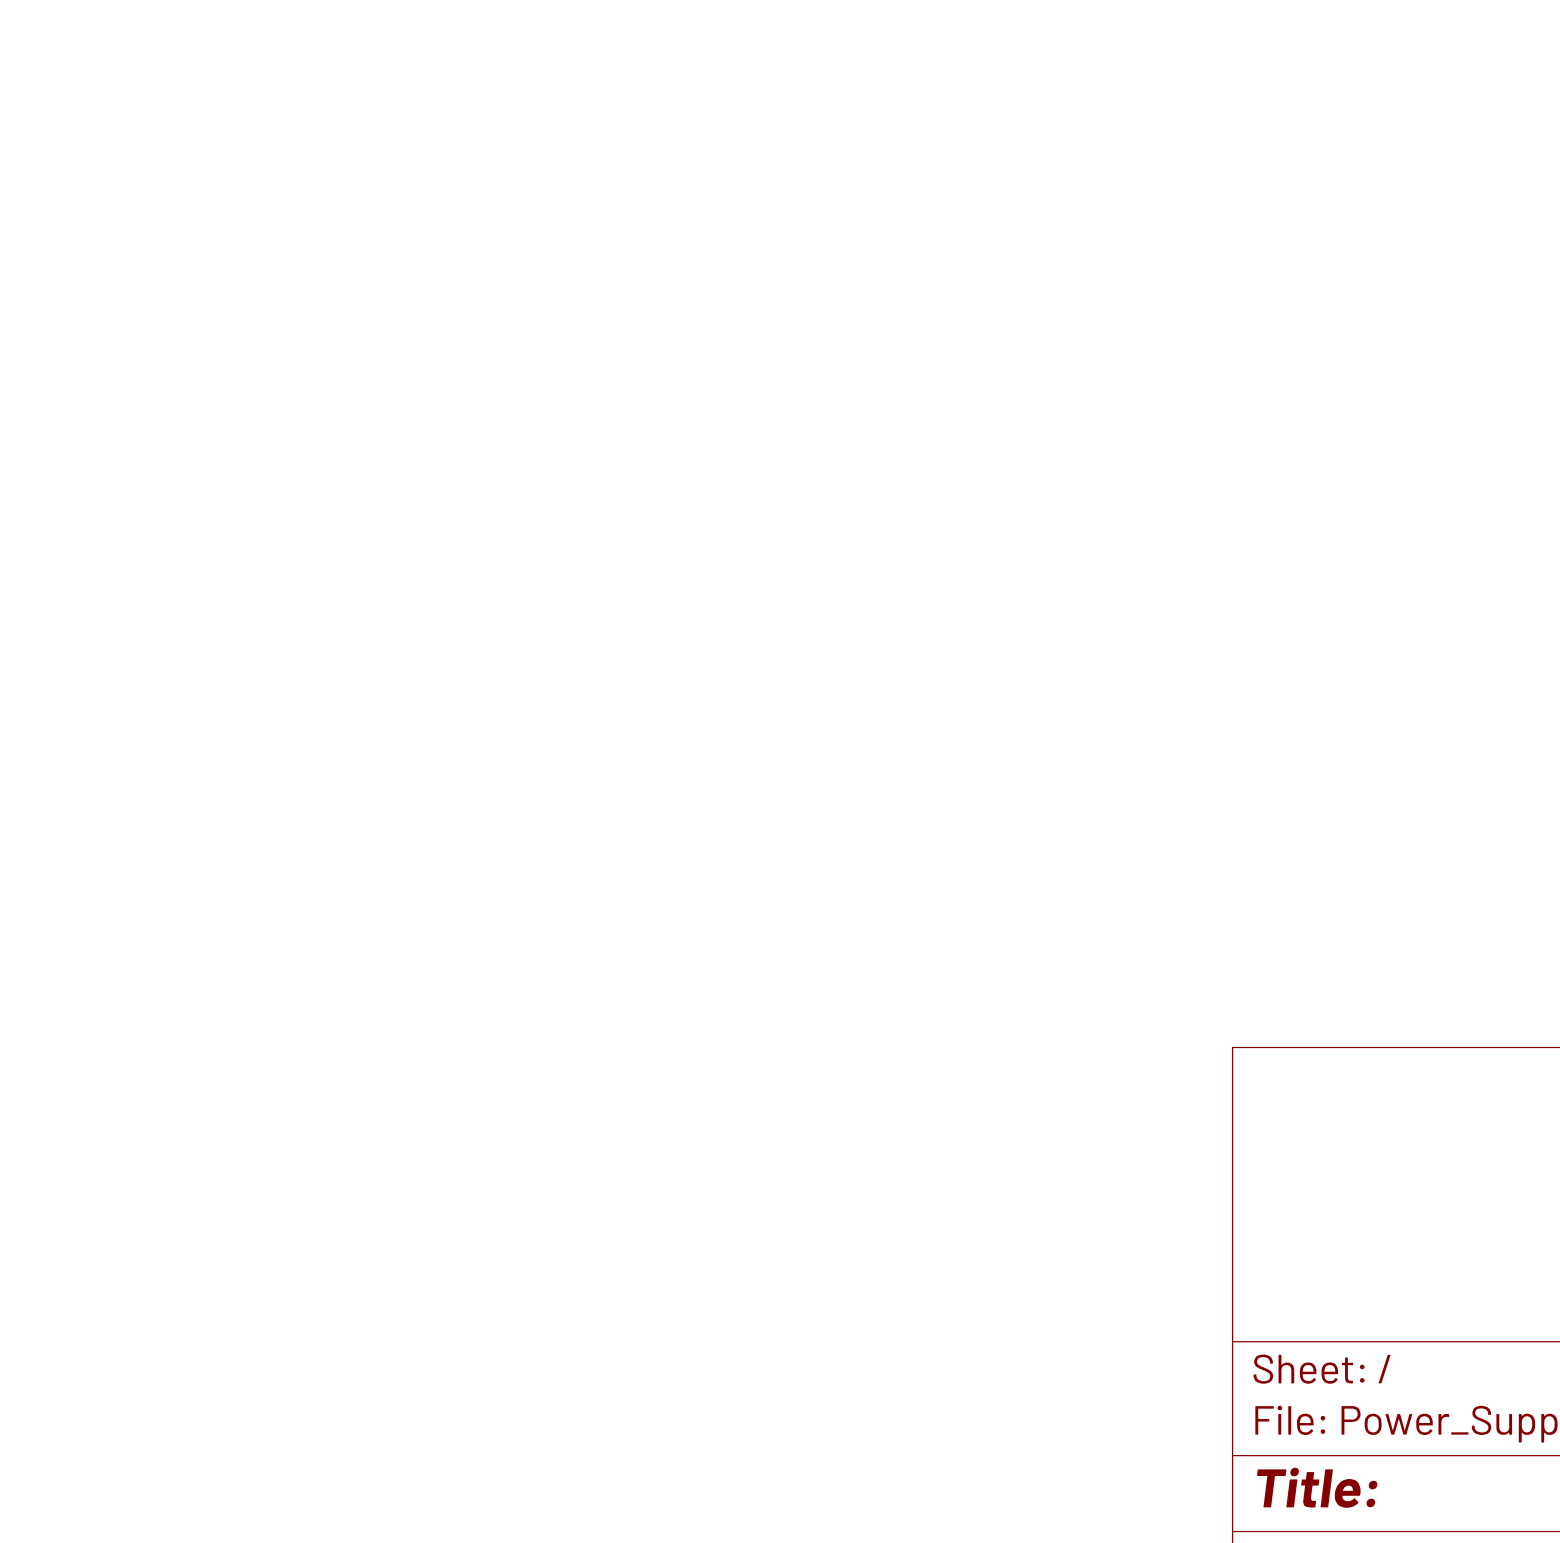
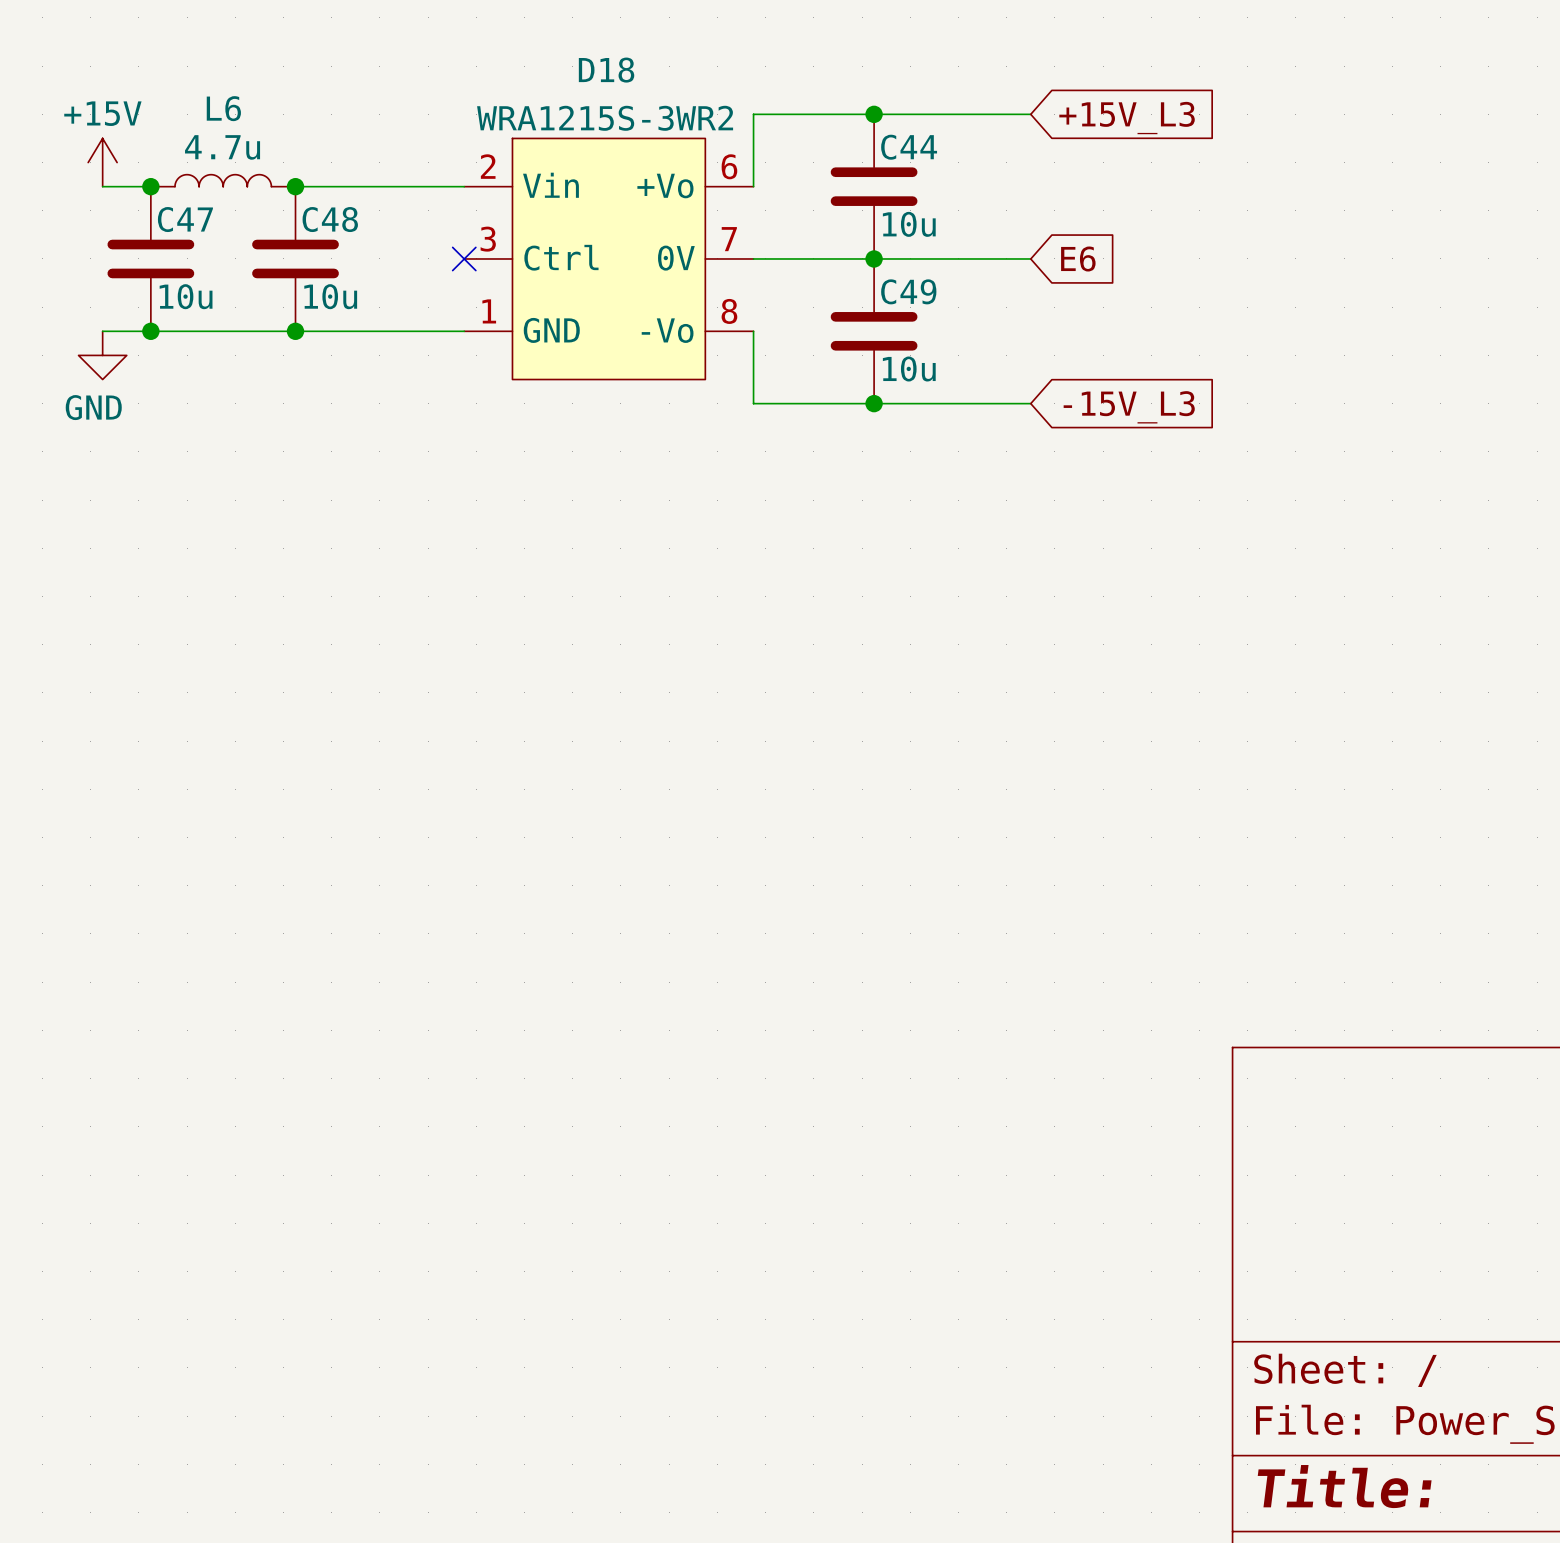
junction: none -> (874, 114)
wire: none -> (1030, 114) (753, 114) (753, 186)
global label: none -> +15V_L3 (1127, 118)
power symbol: none -> +15V (102, 162)
L6: none -> 4.7u (223, 180)
wire: none -> (102, 186) (150, 186)
junction: none -> (150, 186)
wire: none -> (295, 186) (464, 186)
junction: none -> (295, 186)
C44: none -> 10u (874, 186)
C47: none -> 10u (150, 258)
C48: none -> 10u (295, 258)
no-connect mark: none -> (464, 258)
D18: none -> WRA1215S-3WR2 (608, 258)
wire: none -> (753, 258) (1030, 258)
junction: none -> (874, 258)
global label: none -> E6 (1078, 259)
wire: none -> (102, 331) (464, 331)
junction: none -> (150, 331)
junction: none -> (295, 331)
wire: none -> (753, 331) (753, 403) (1030, 403)
C49: none -> 10u (874, 331)
power symbol: none -> GND (102, 355)
junction: none -> (874, 403)
global label: none -> -15V_L3 (1129, 407)

